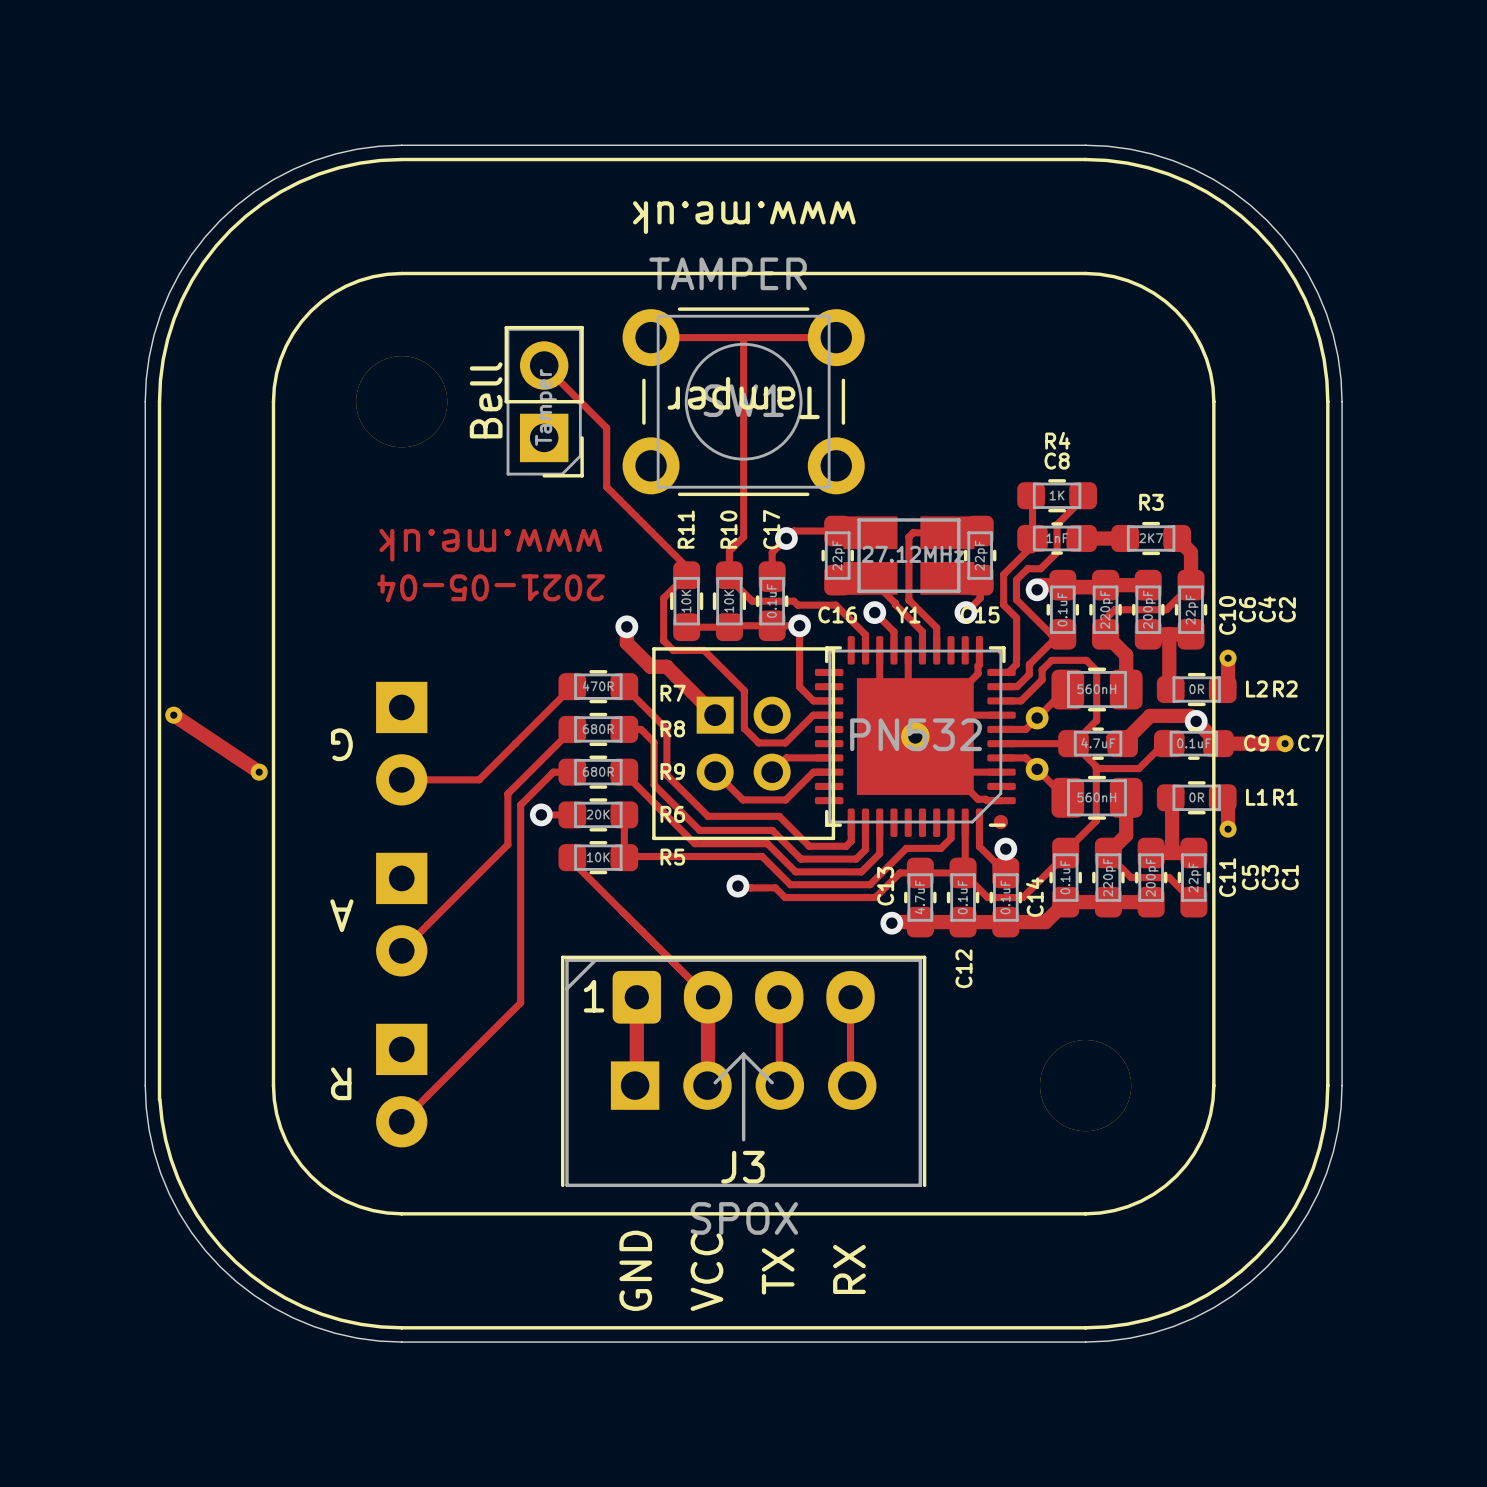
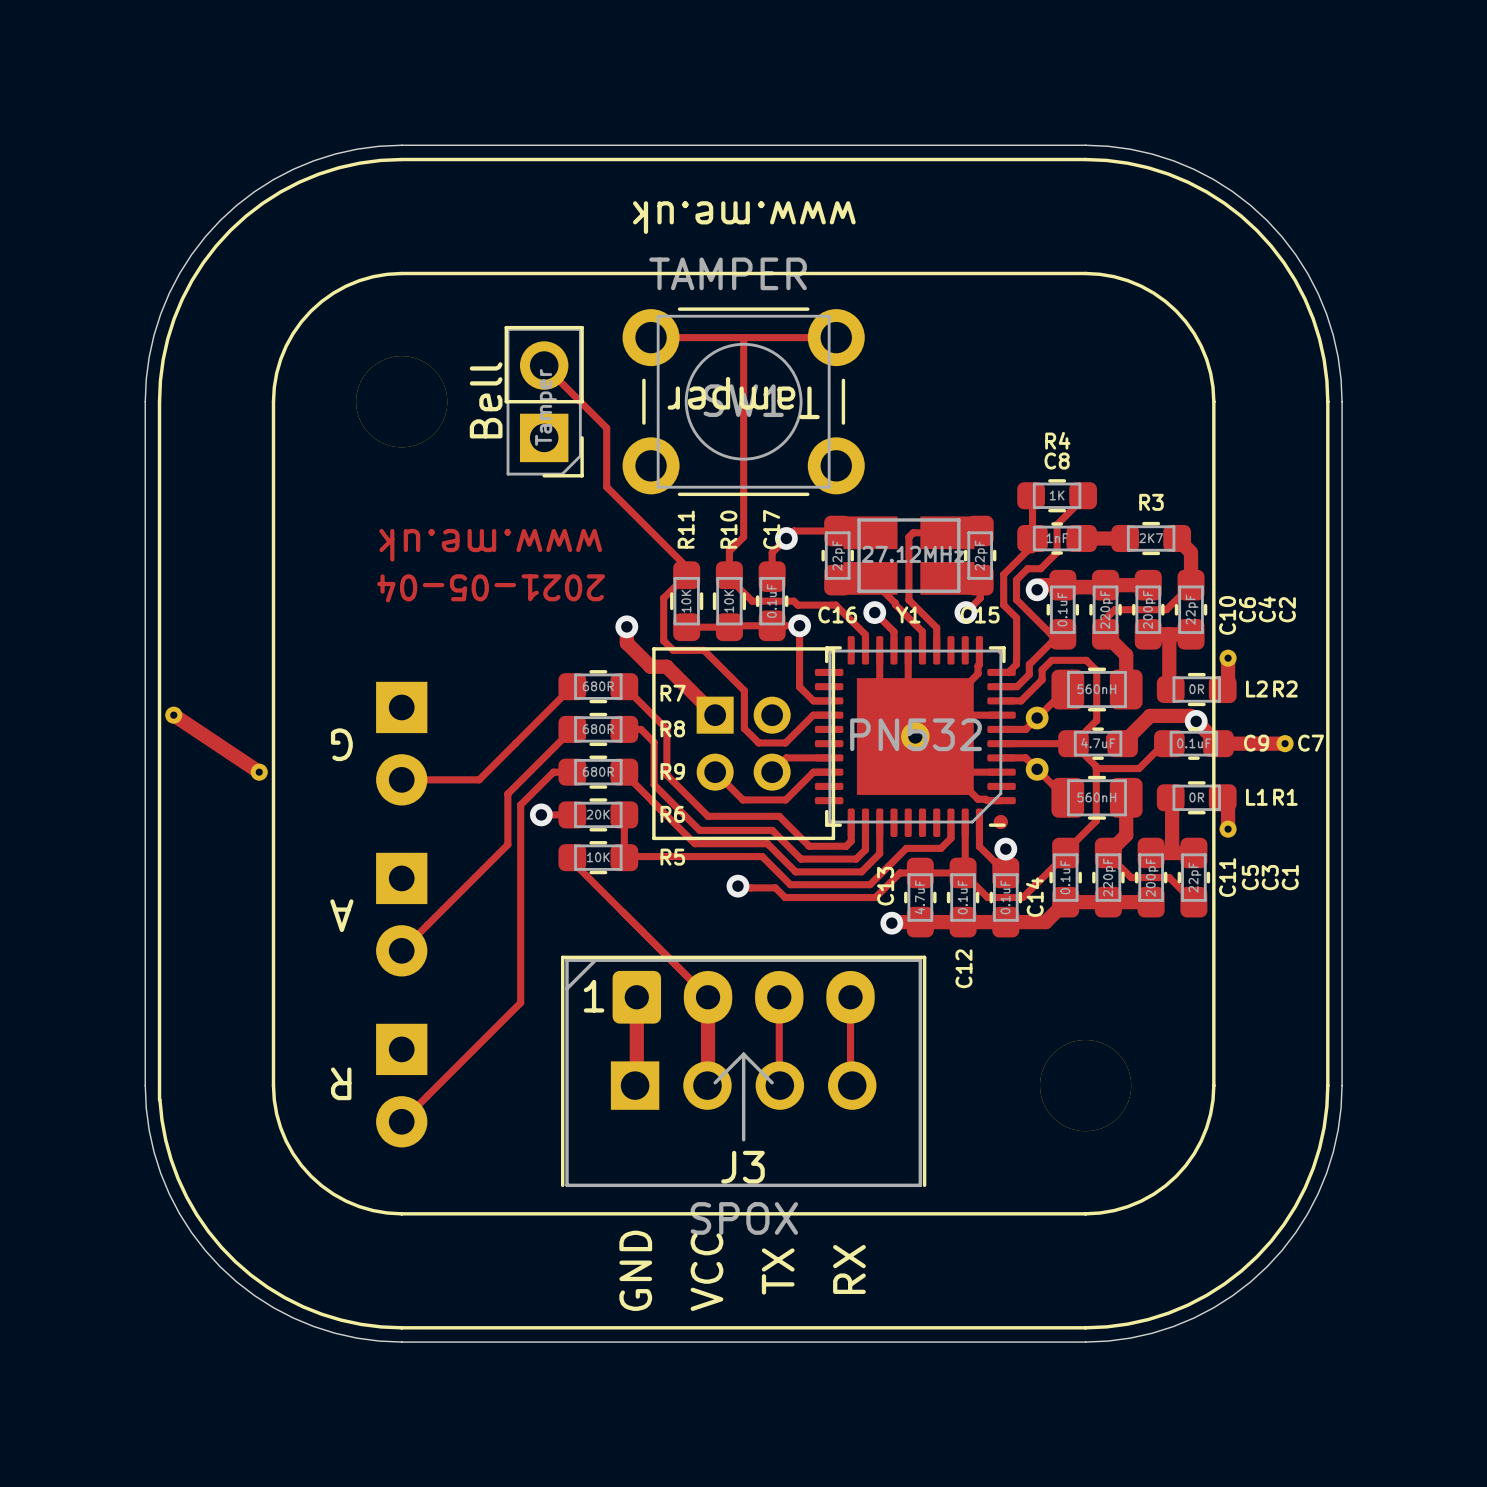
R7 value: 470R (598, 686) -> 680R (598, 686)

